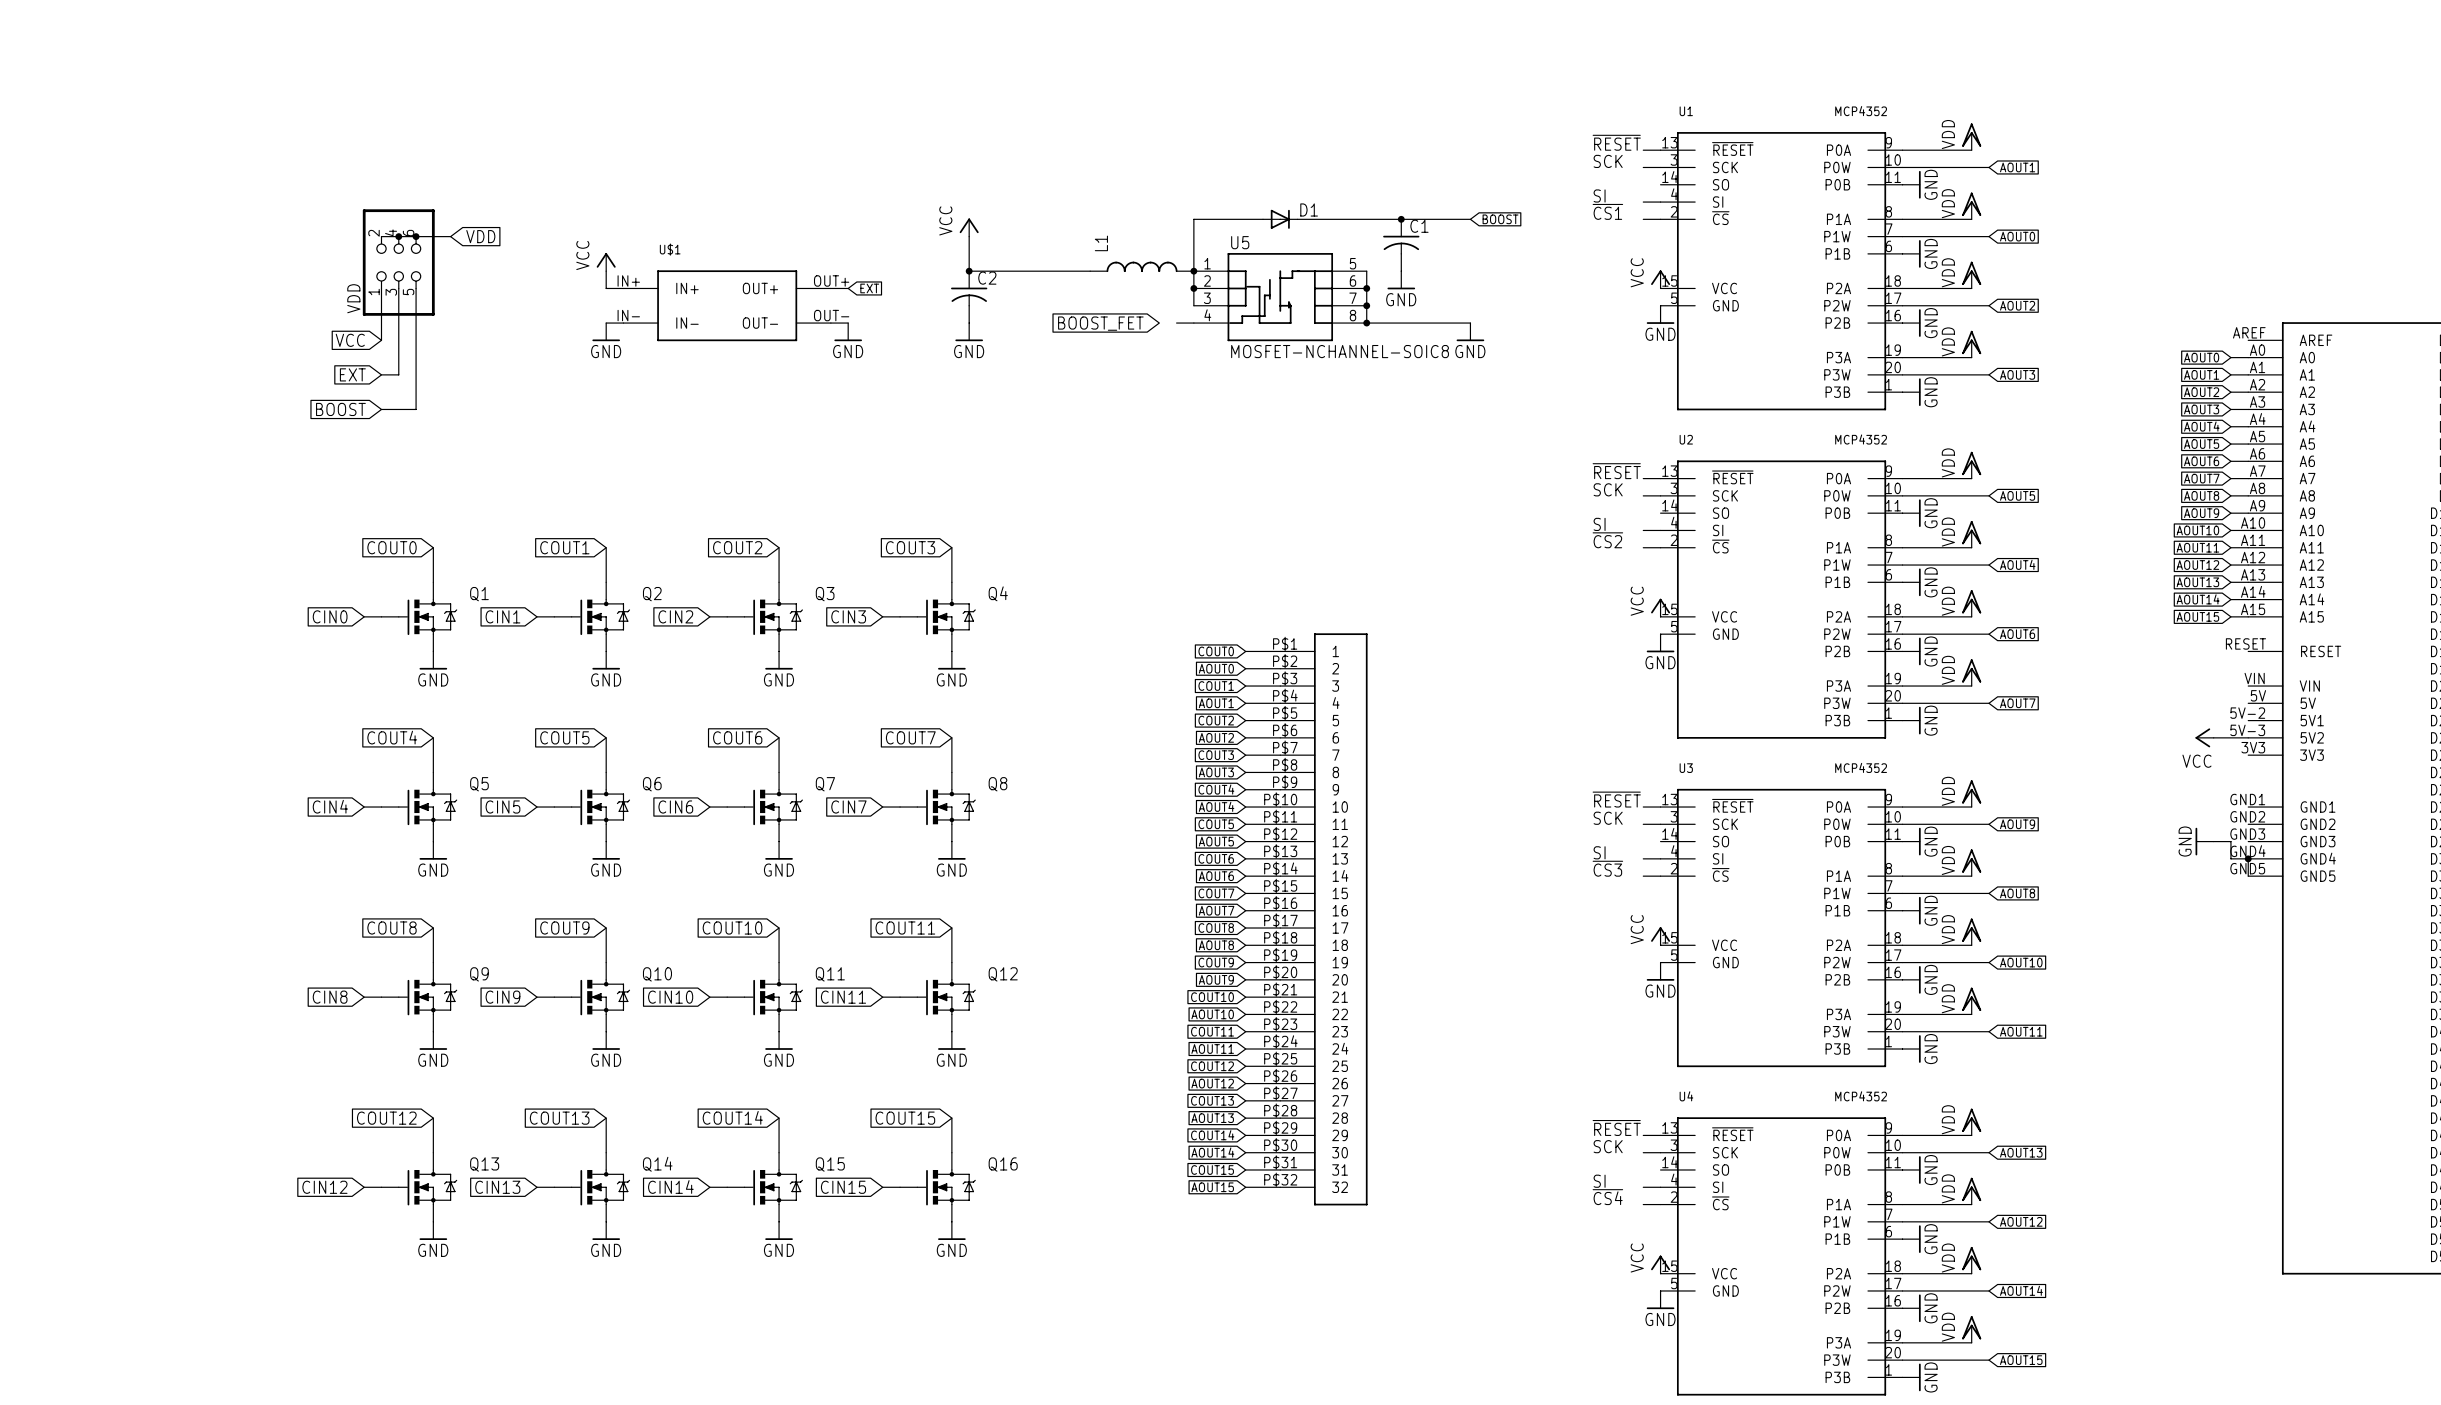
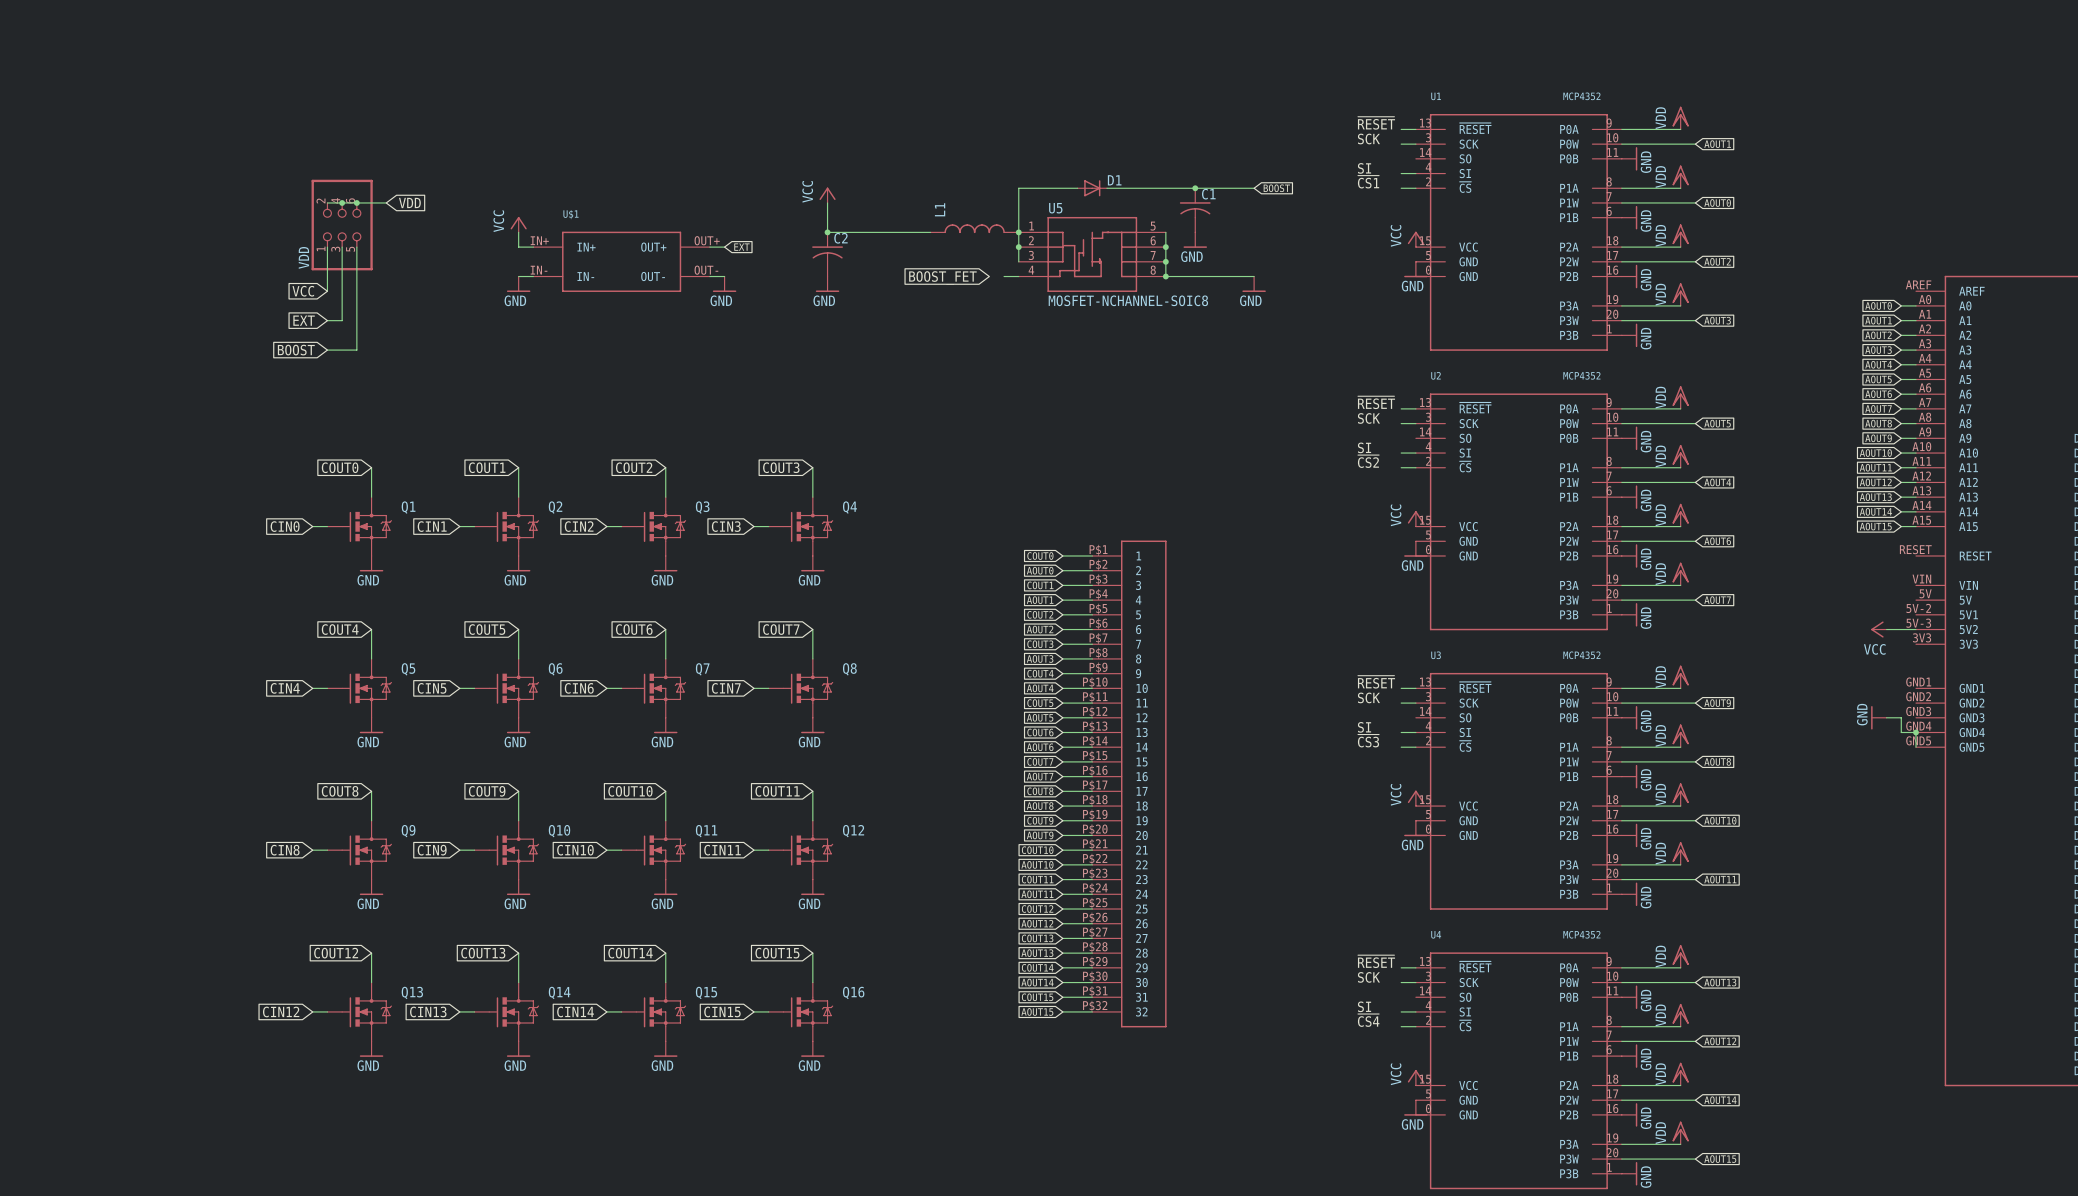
U1 symbol: [1660, 132, 1903, 411] -> [1415, 113, 1622, 351]
U2 symbol: [1660, 460, 1903, 739] -> [1415, 393, 1622, 631]
U3 symbol: [1660, 788, 1903, 1068] -> [1415, 672, 1622, 910]
U4 symbol: [1660, 1117, 1903, 1396] -> [1415, 952, 1622, 1190]

